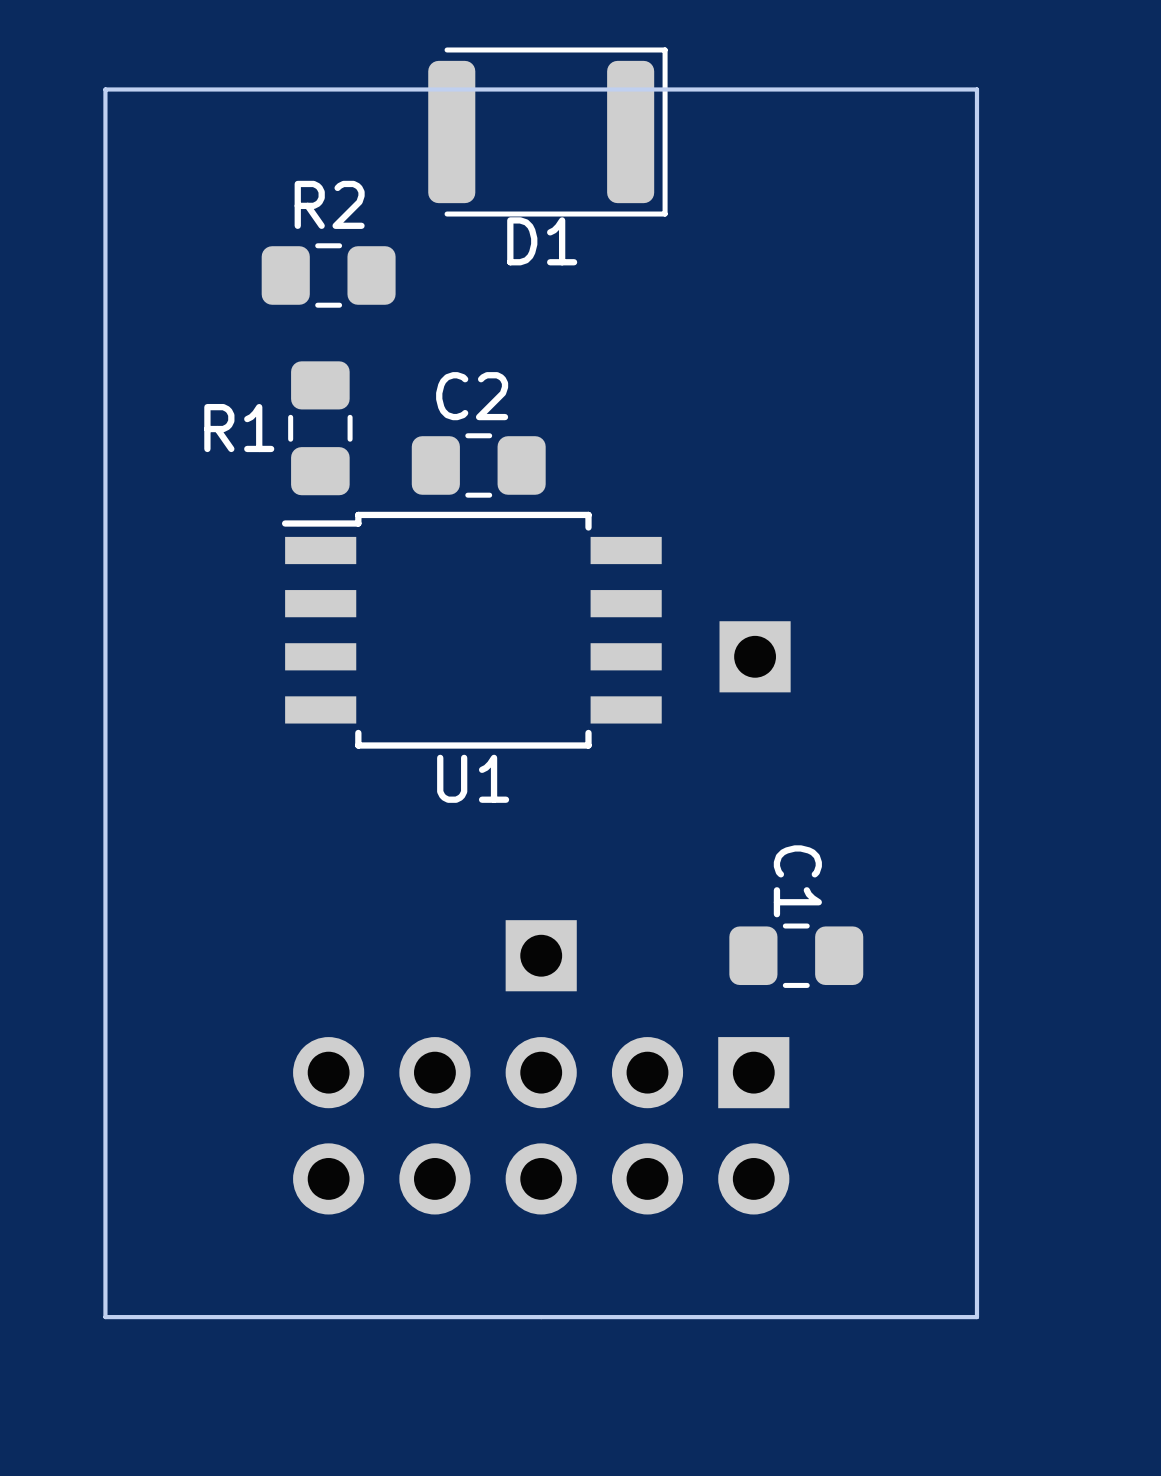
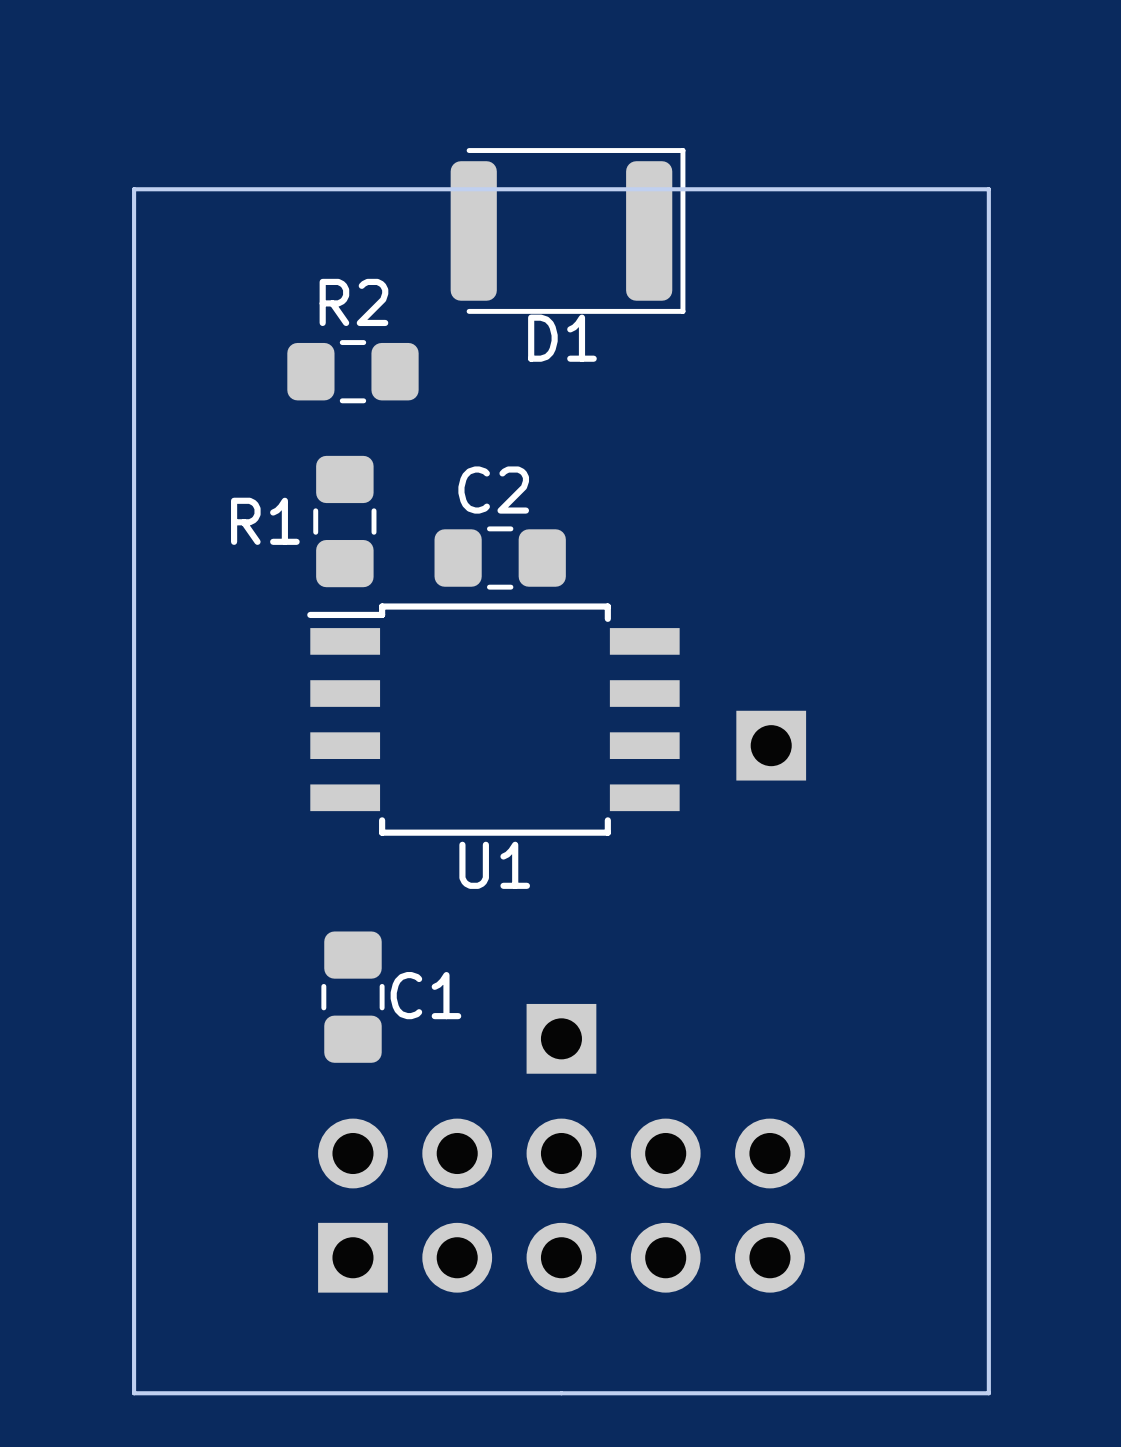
C1 rotation: 0° (796, 955) -> 90° clockwise (352, 997)
C1 position: (796, 955) -> (352, 997)
part rotation: 0° (541, 1125) -> 180° (561, 1205)

